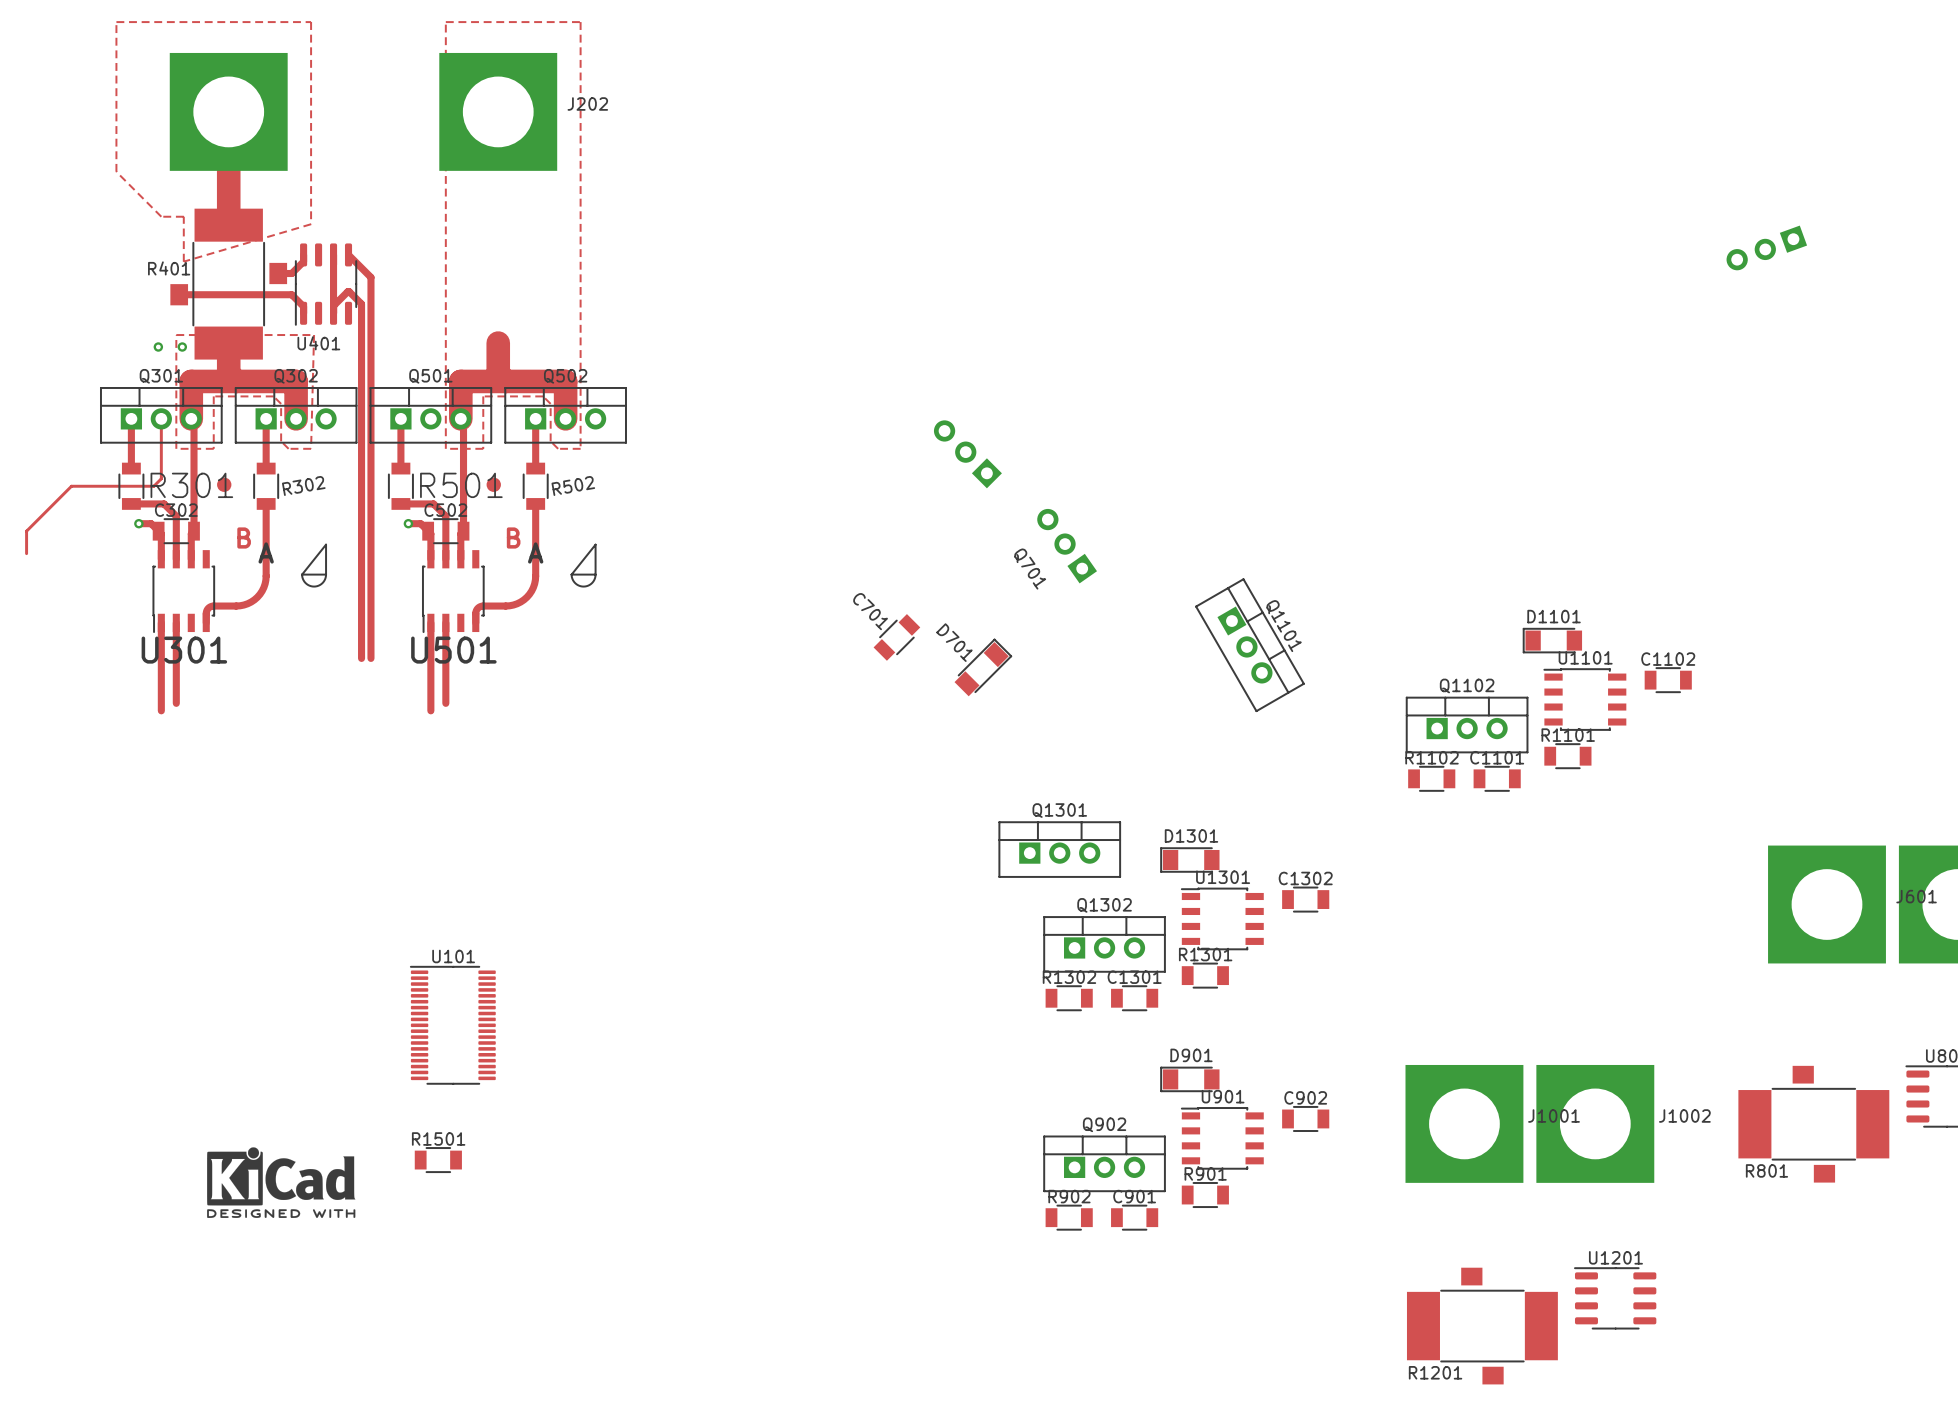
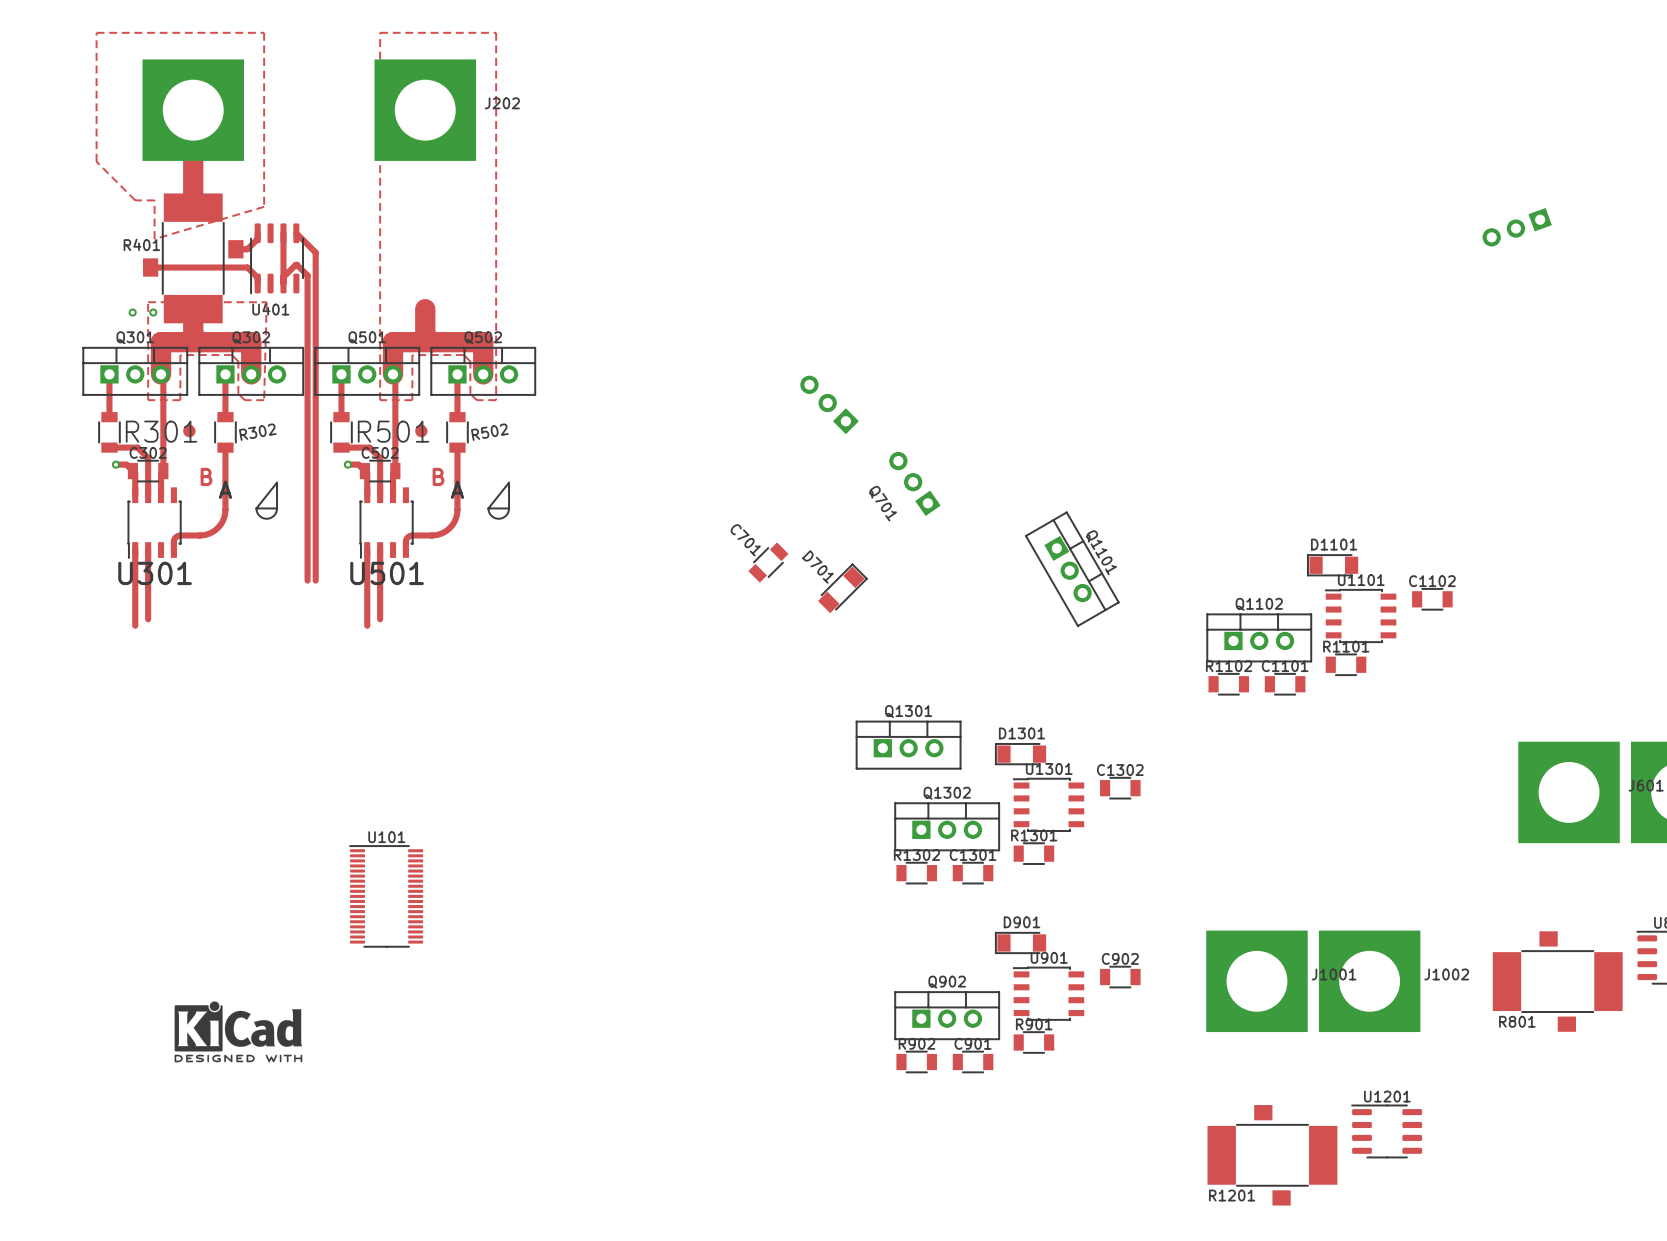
track: (161, 418) (161, 478) (153, 486) (71, 486) (26, 531) (26, 553) -> none
R1501: (438, 1160) -> none

